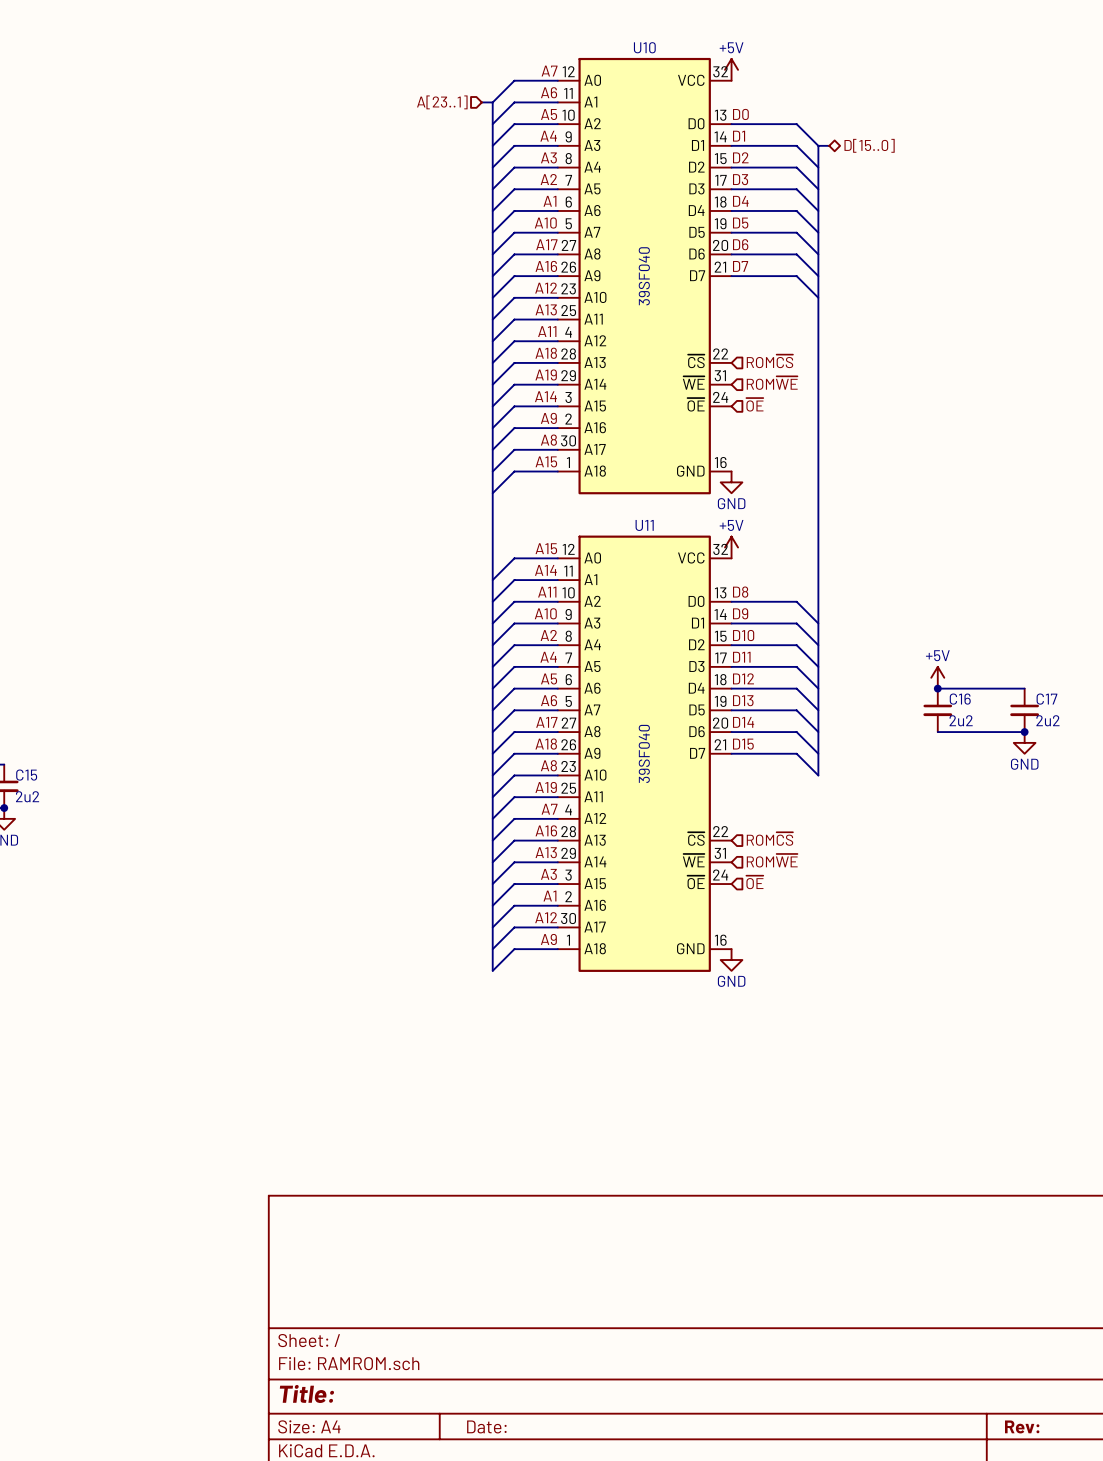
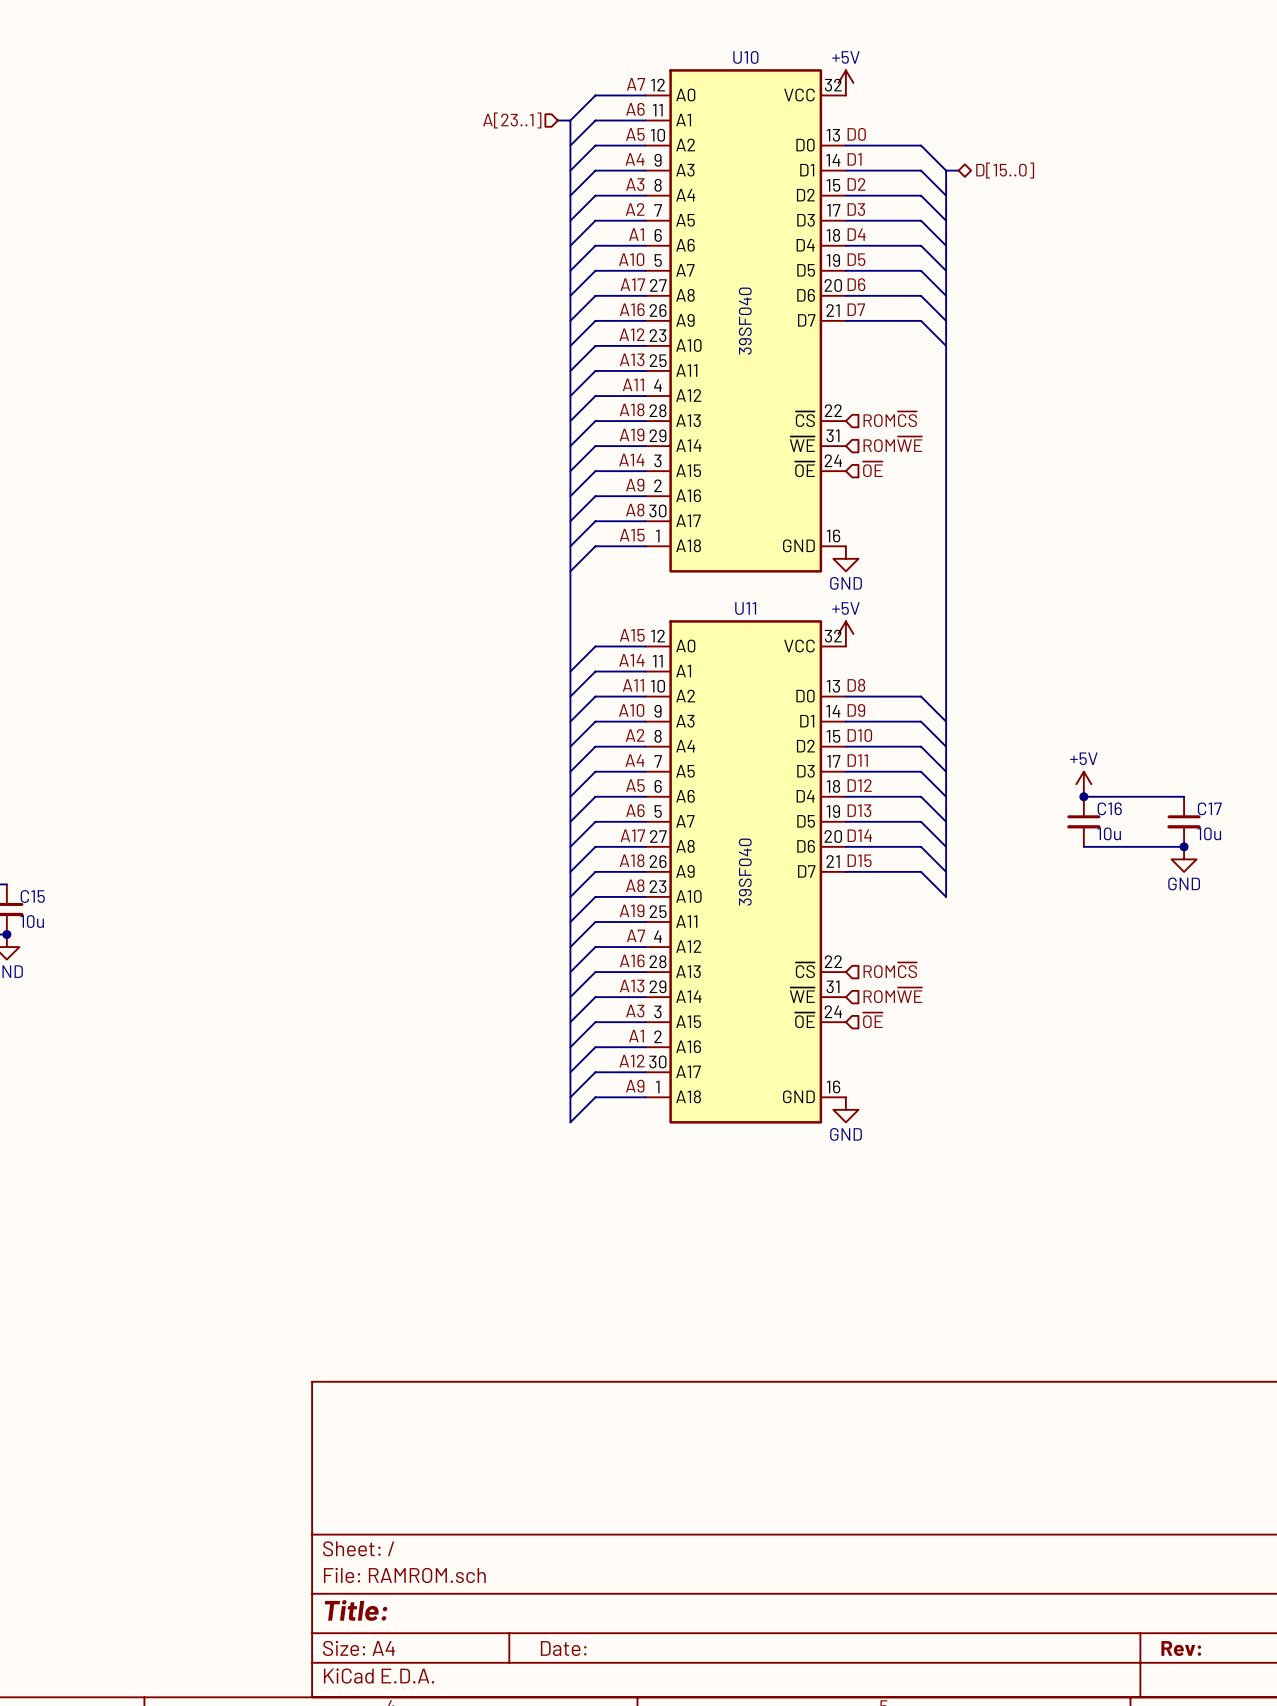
C16 value: 2u2 (961, 720) -> 10u (1109, 833)
C17 value: 2u2 (1047, 720) -> 10u (1209, 833)
C15 value: 2u2 (27, 796) -> 10u (32, 921)

